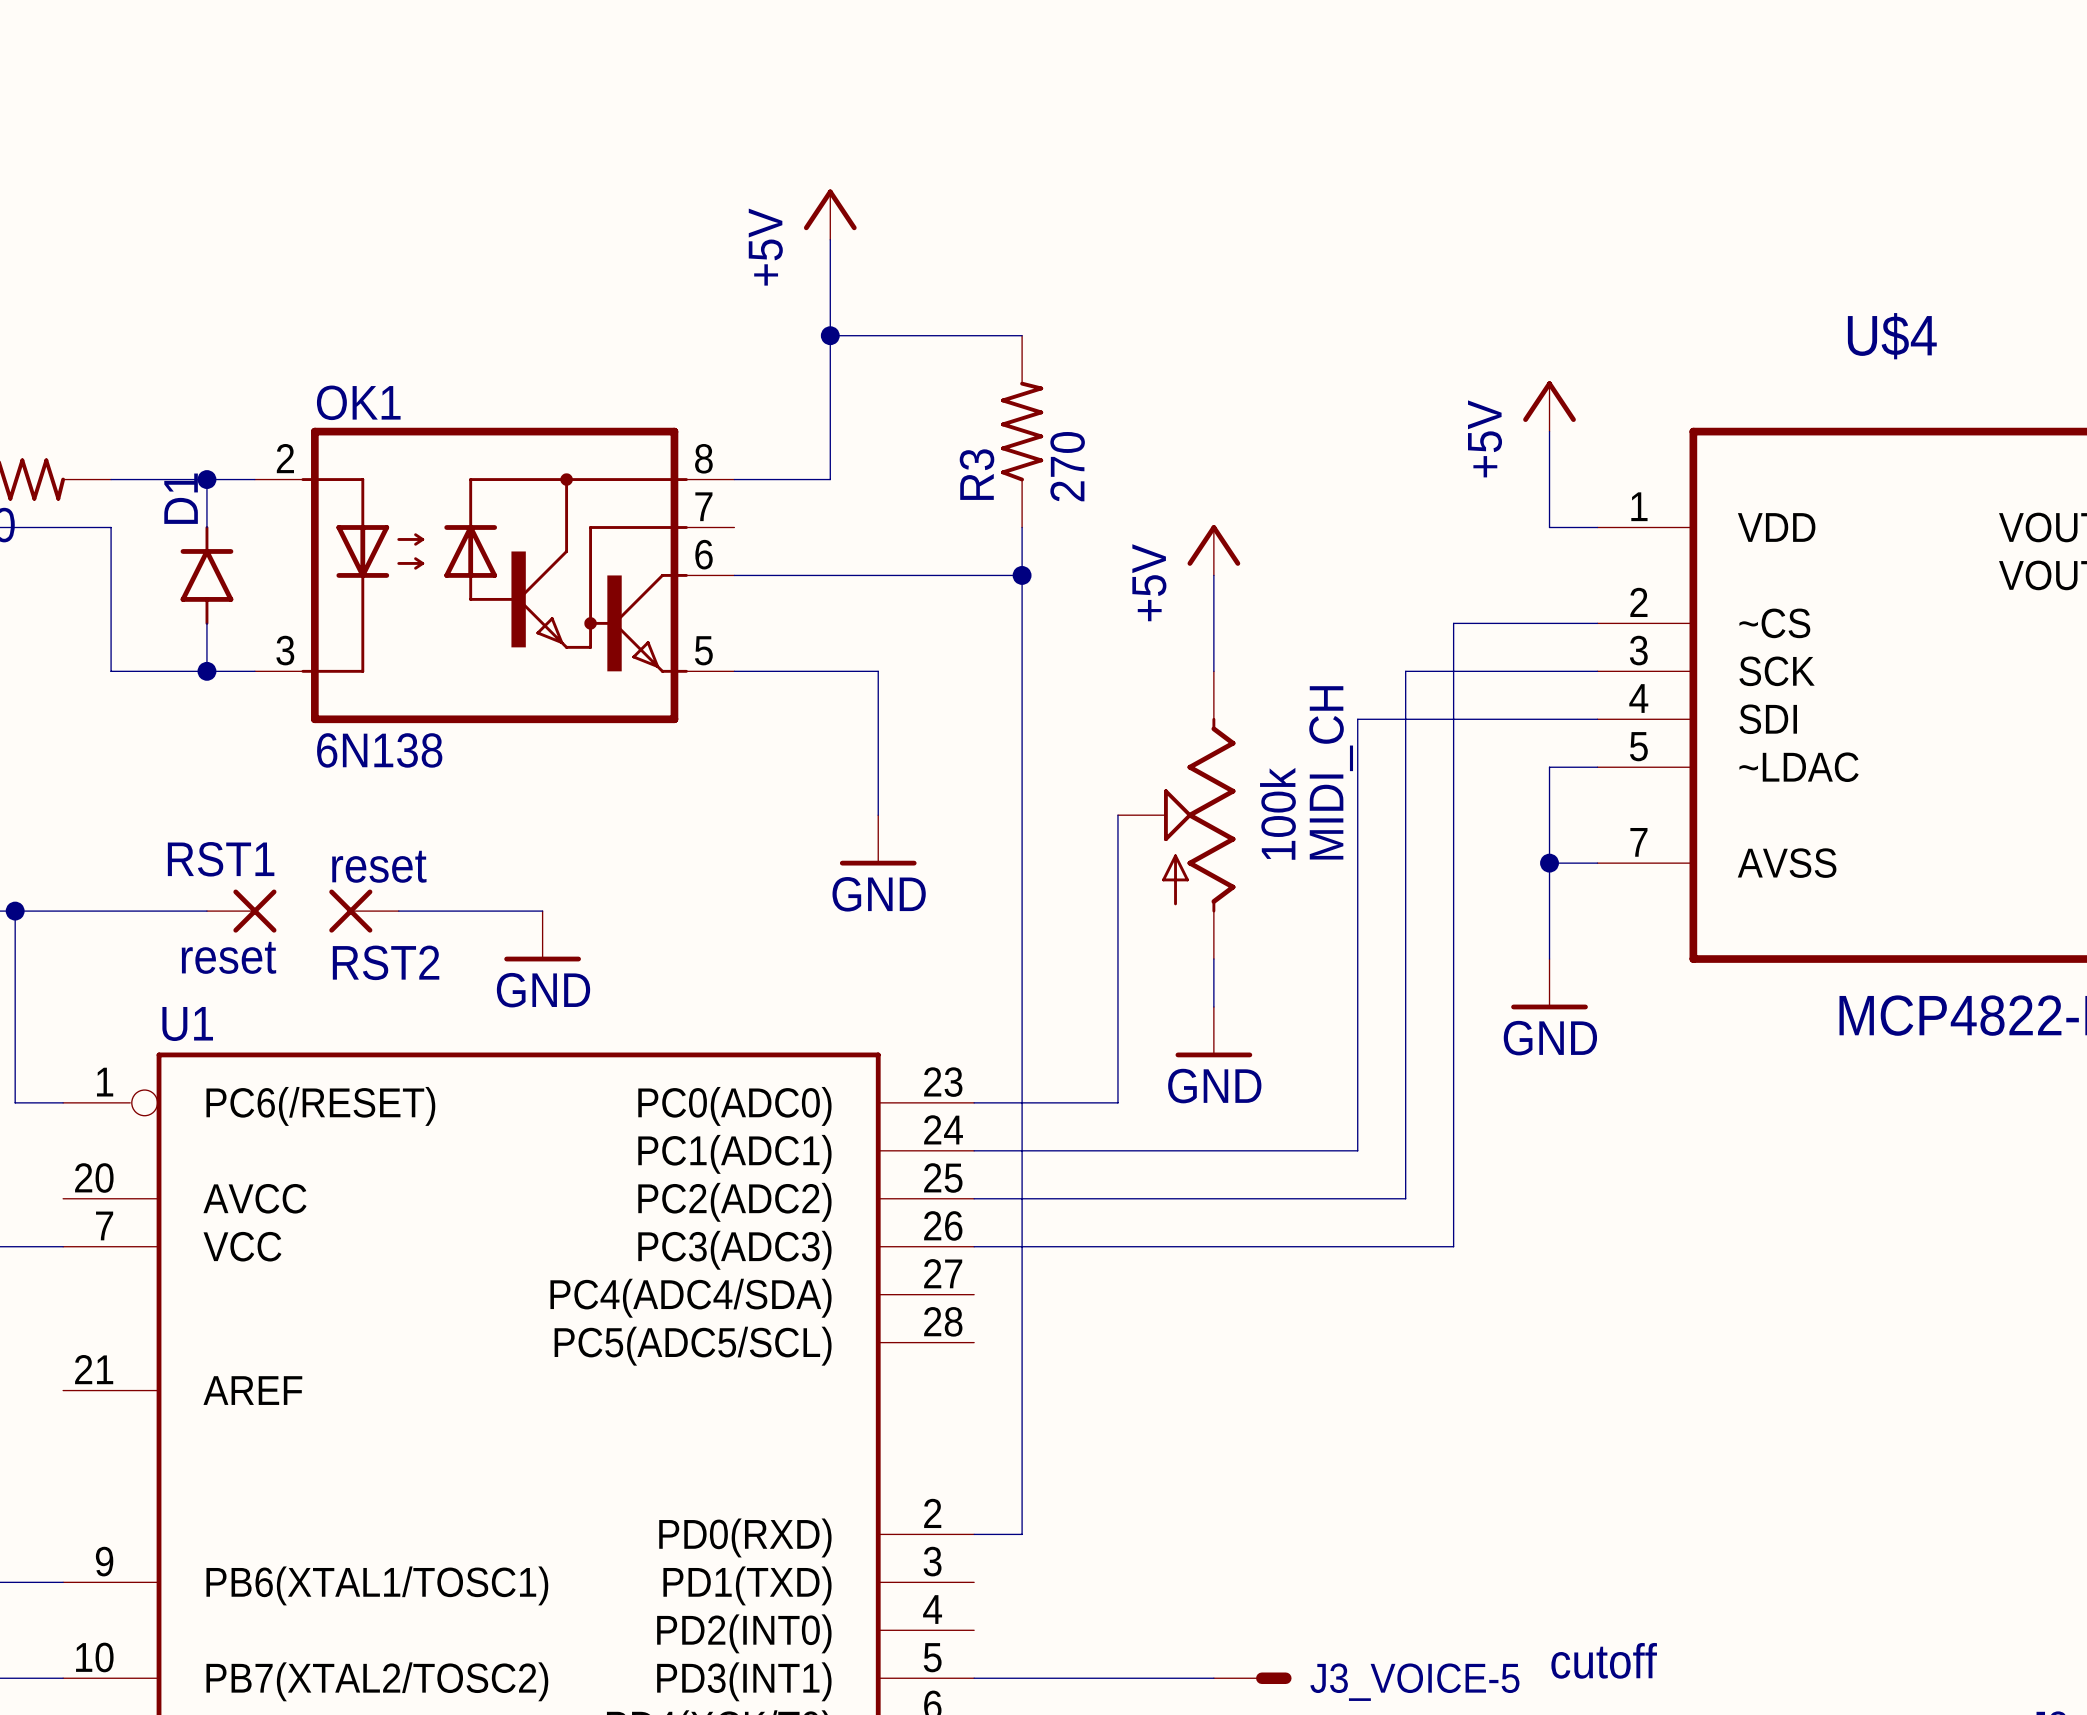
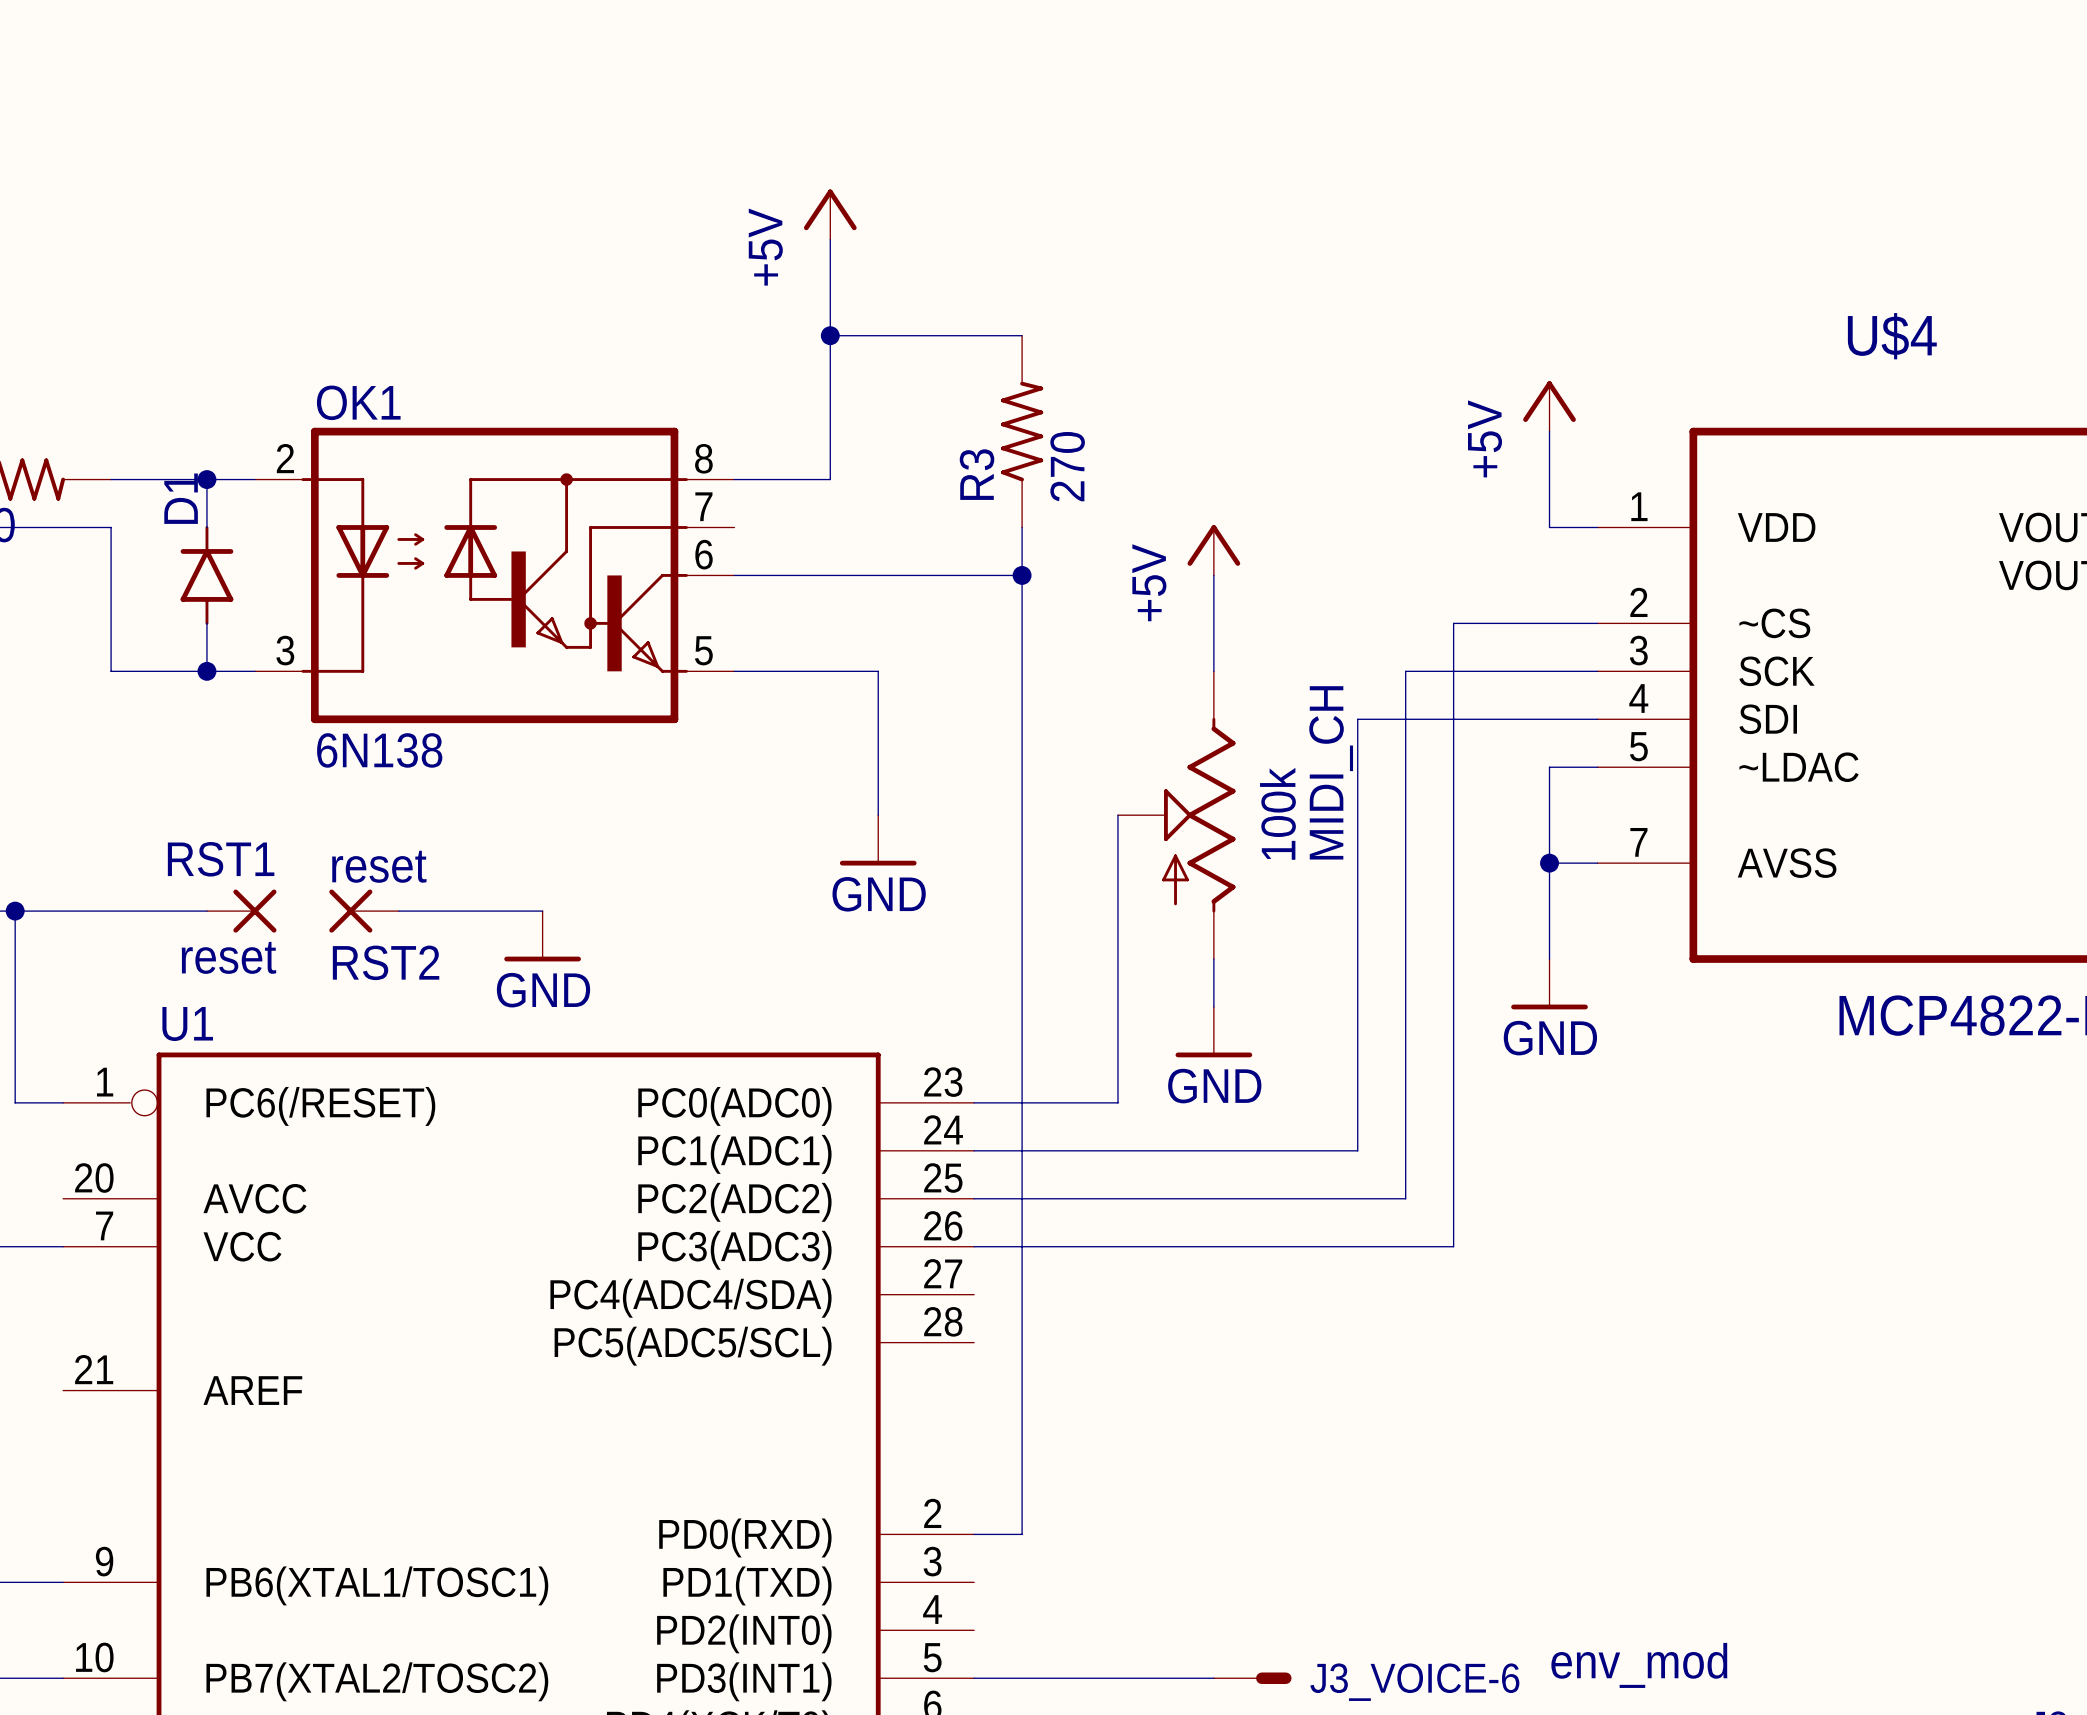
text: cutoff (1604, 1660) -> env_mod (1639, 1665)
J3_VOICE-5 name: J3_VOICE-5 (1414, 1682) -> J3_VOICE-6 (1414, 1682)

